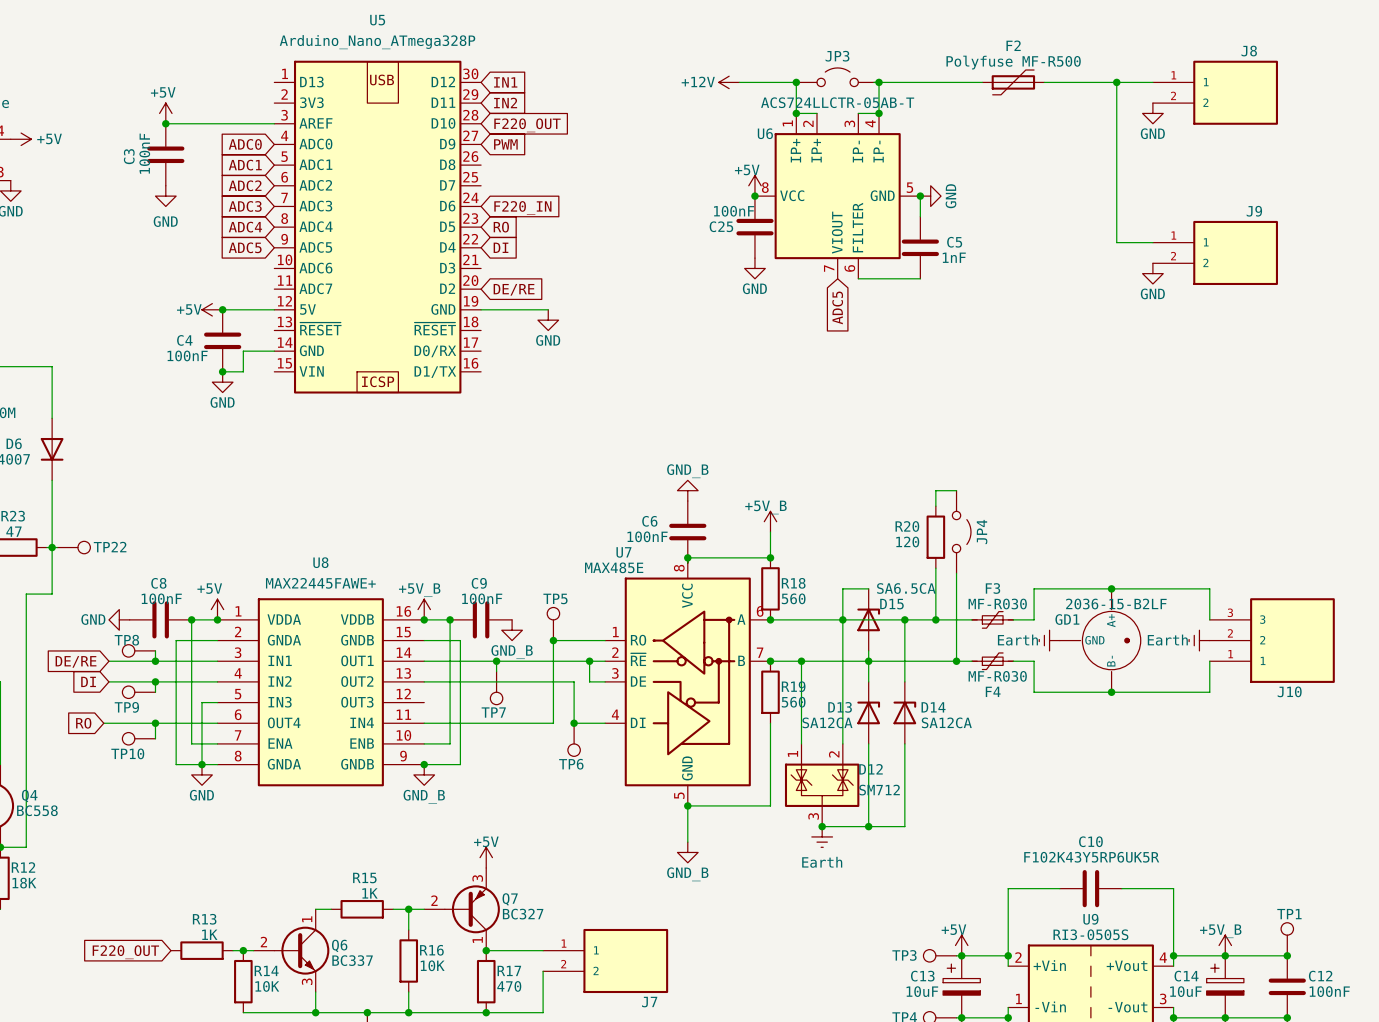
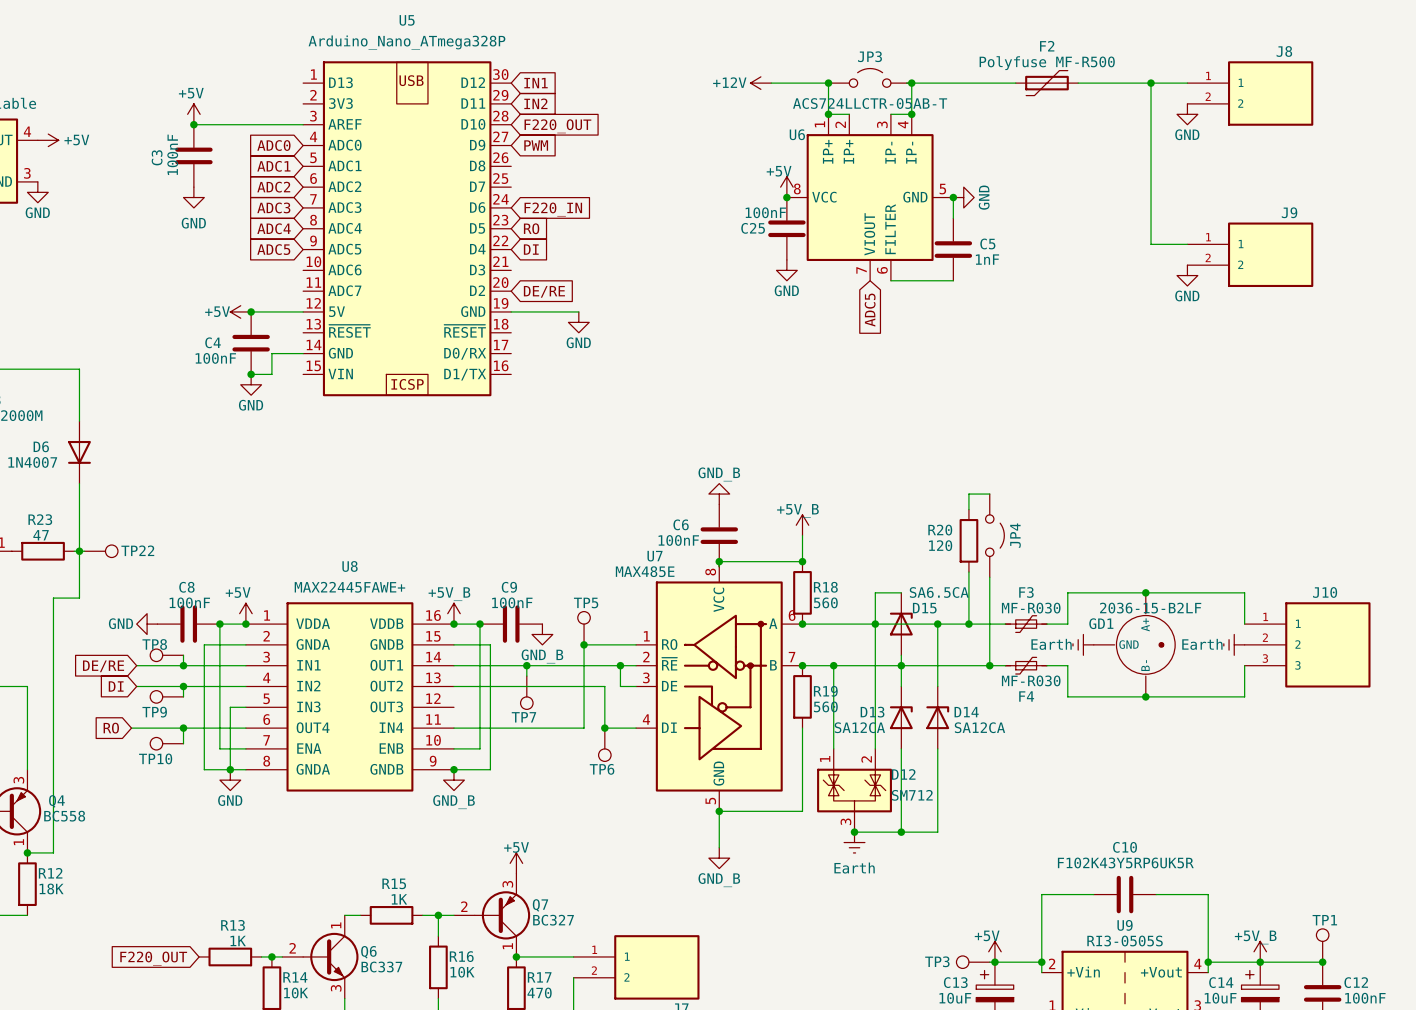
J10 flip: as is (1292, 640) -> up-down (1327, 644)

